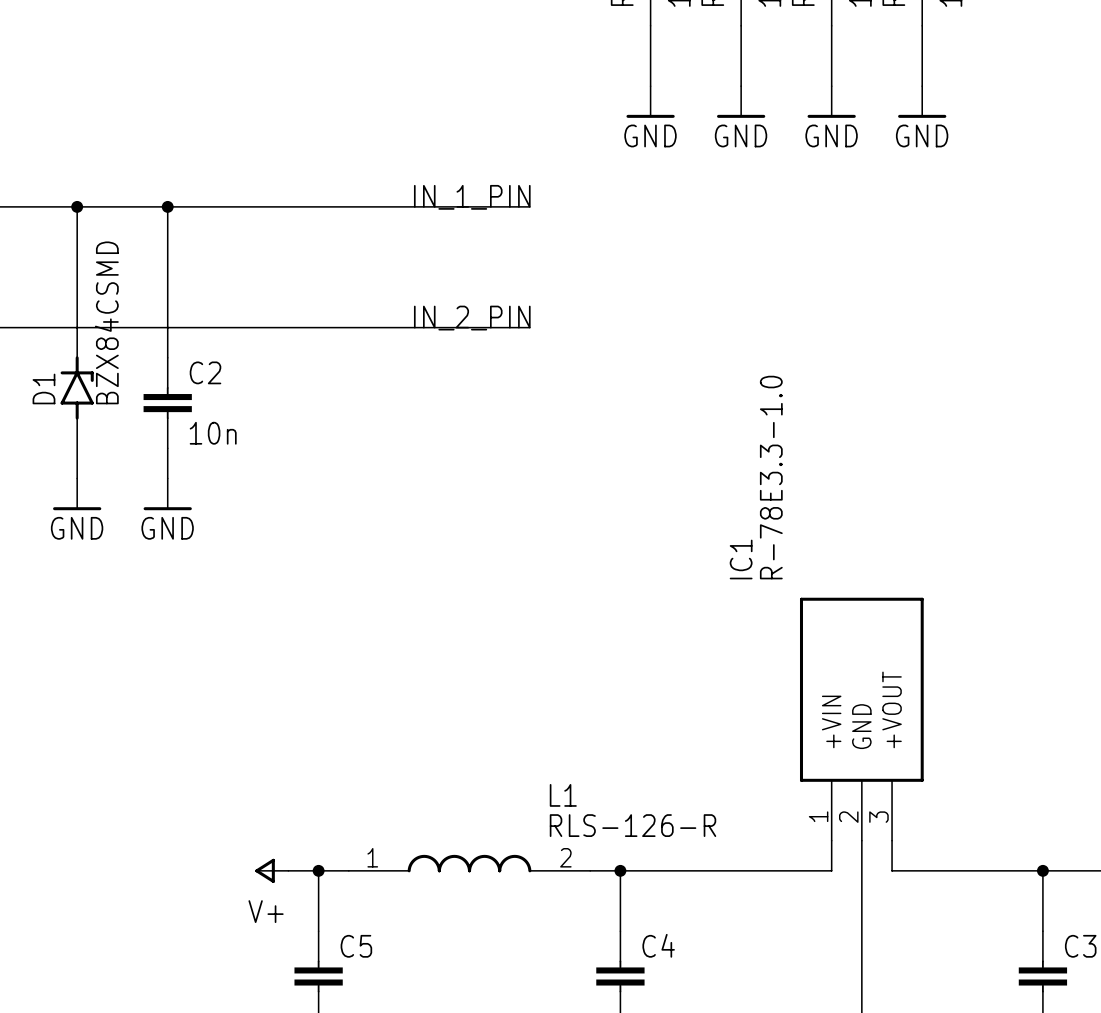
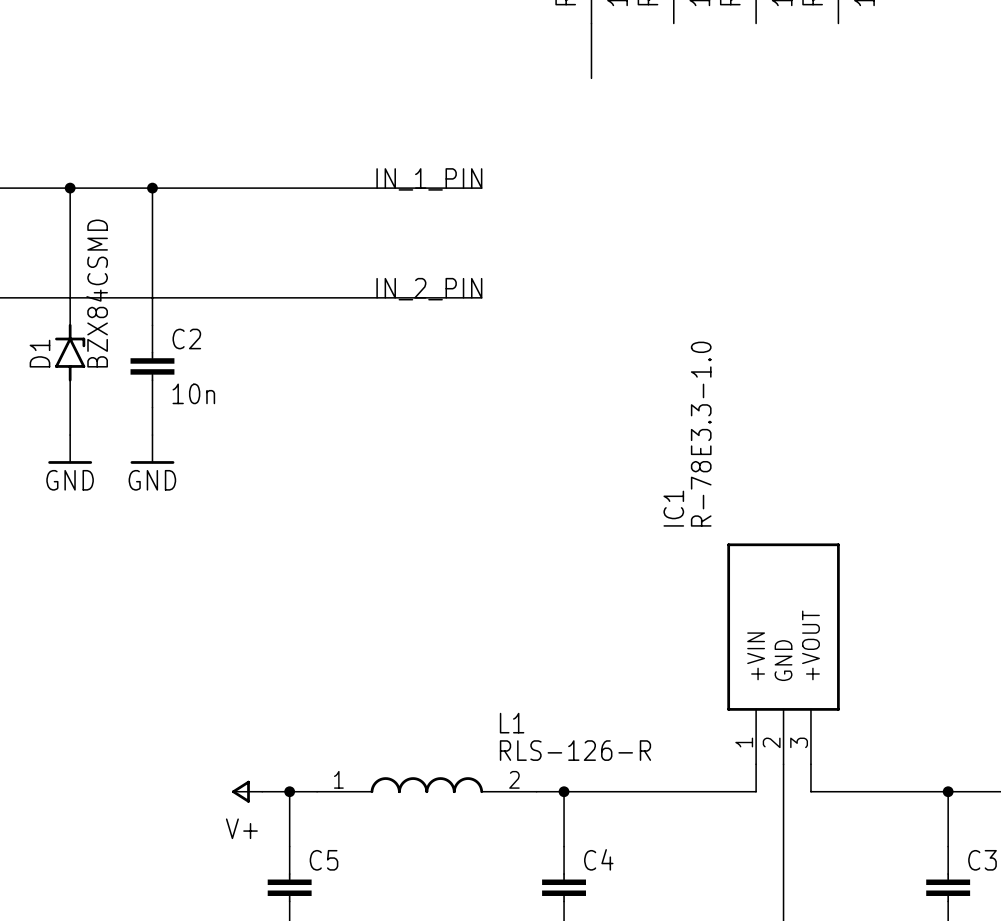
wire: (741, 25) (741, 86) -> none
wire: (831, 25) (831, 86) -> none
wire: (922, 25) (922, 86) -> none
power symbol: GND (650, 102) -> none
power symbol: GND (741, 102) -> none
power symbol: GND (831, 102) -> none
power symbol: GND (922, 102) -> none

